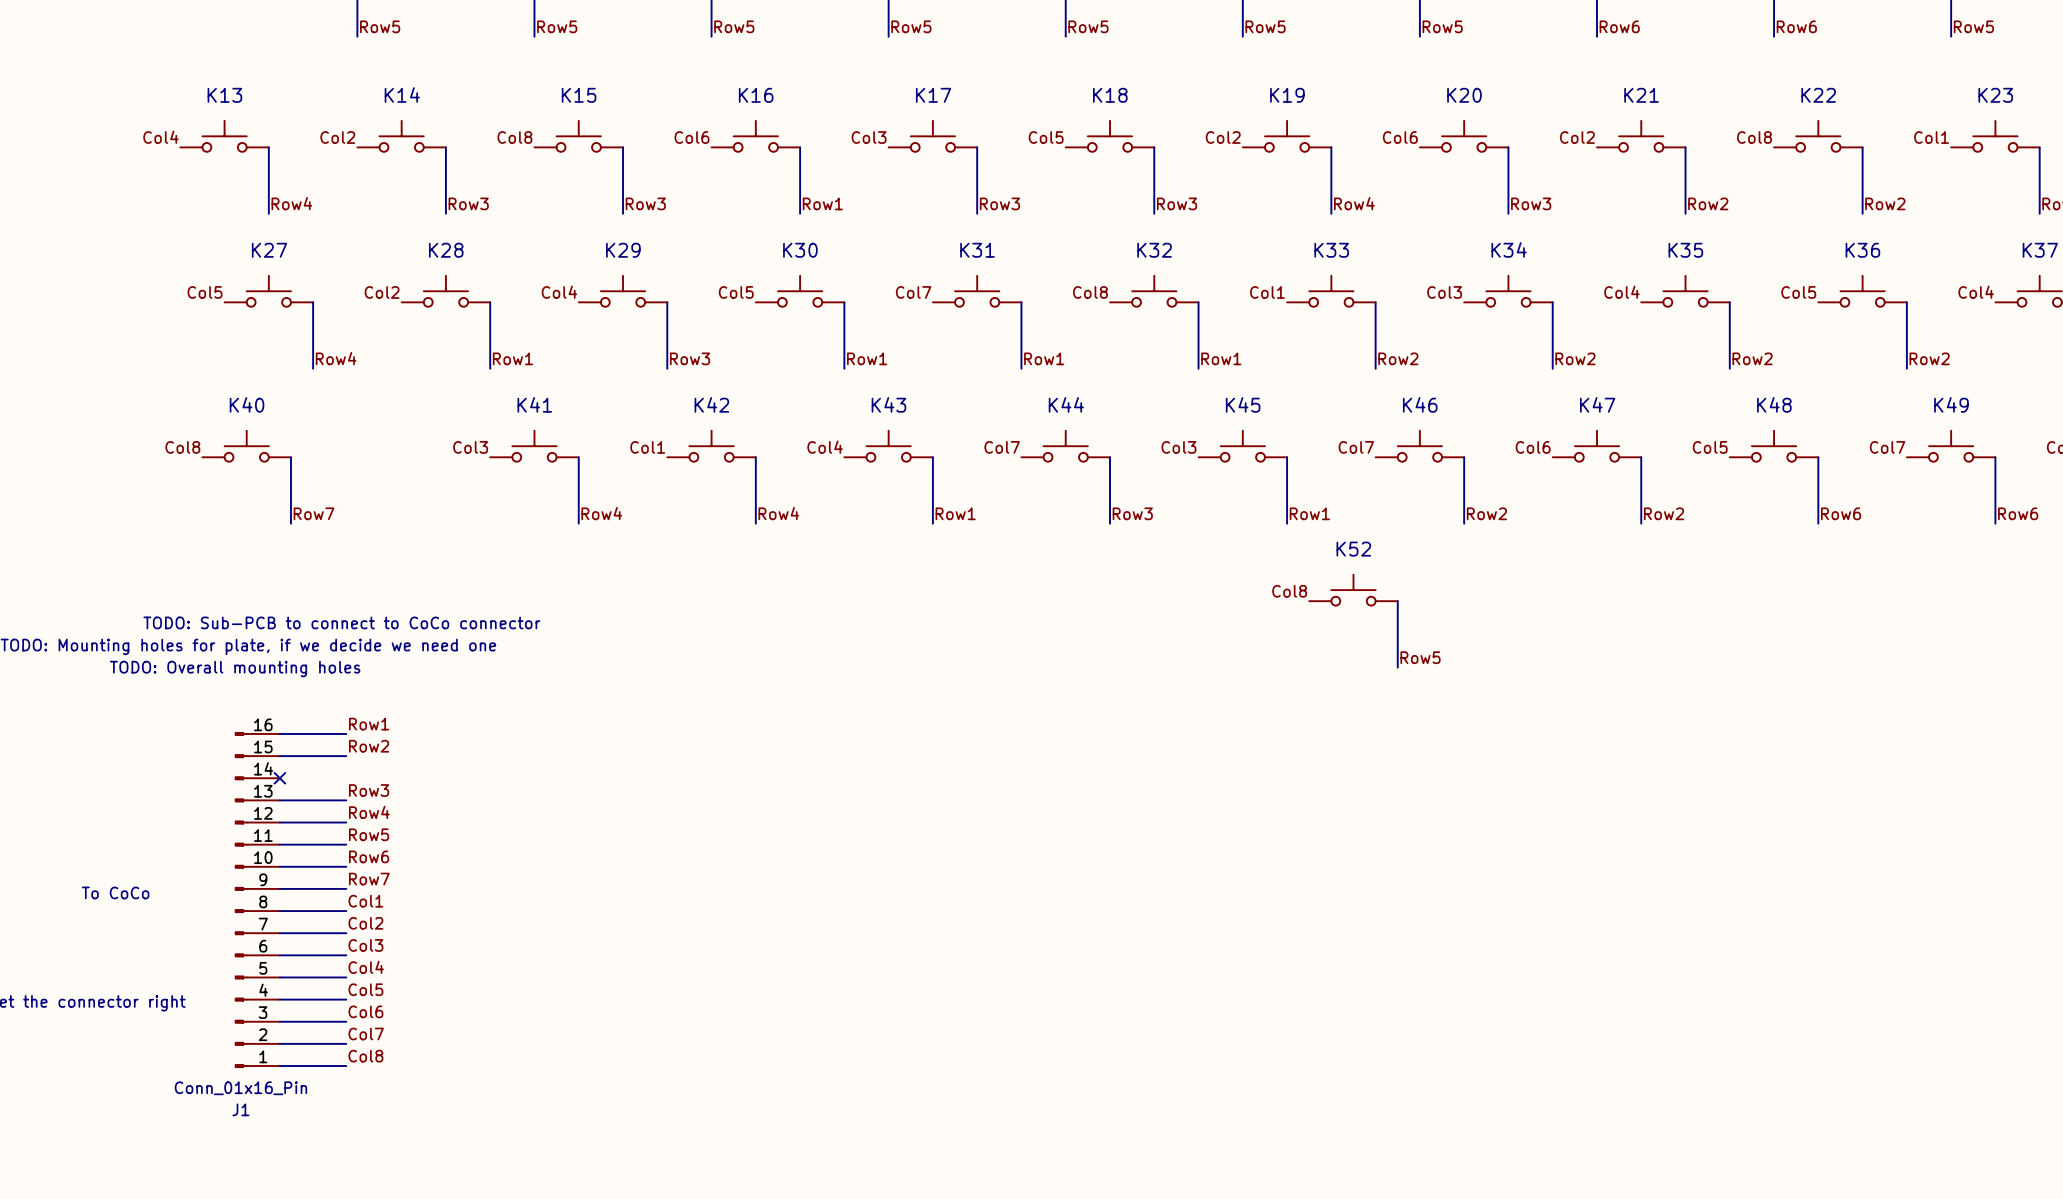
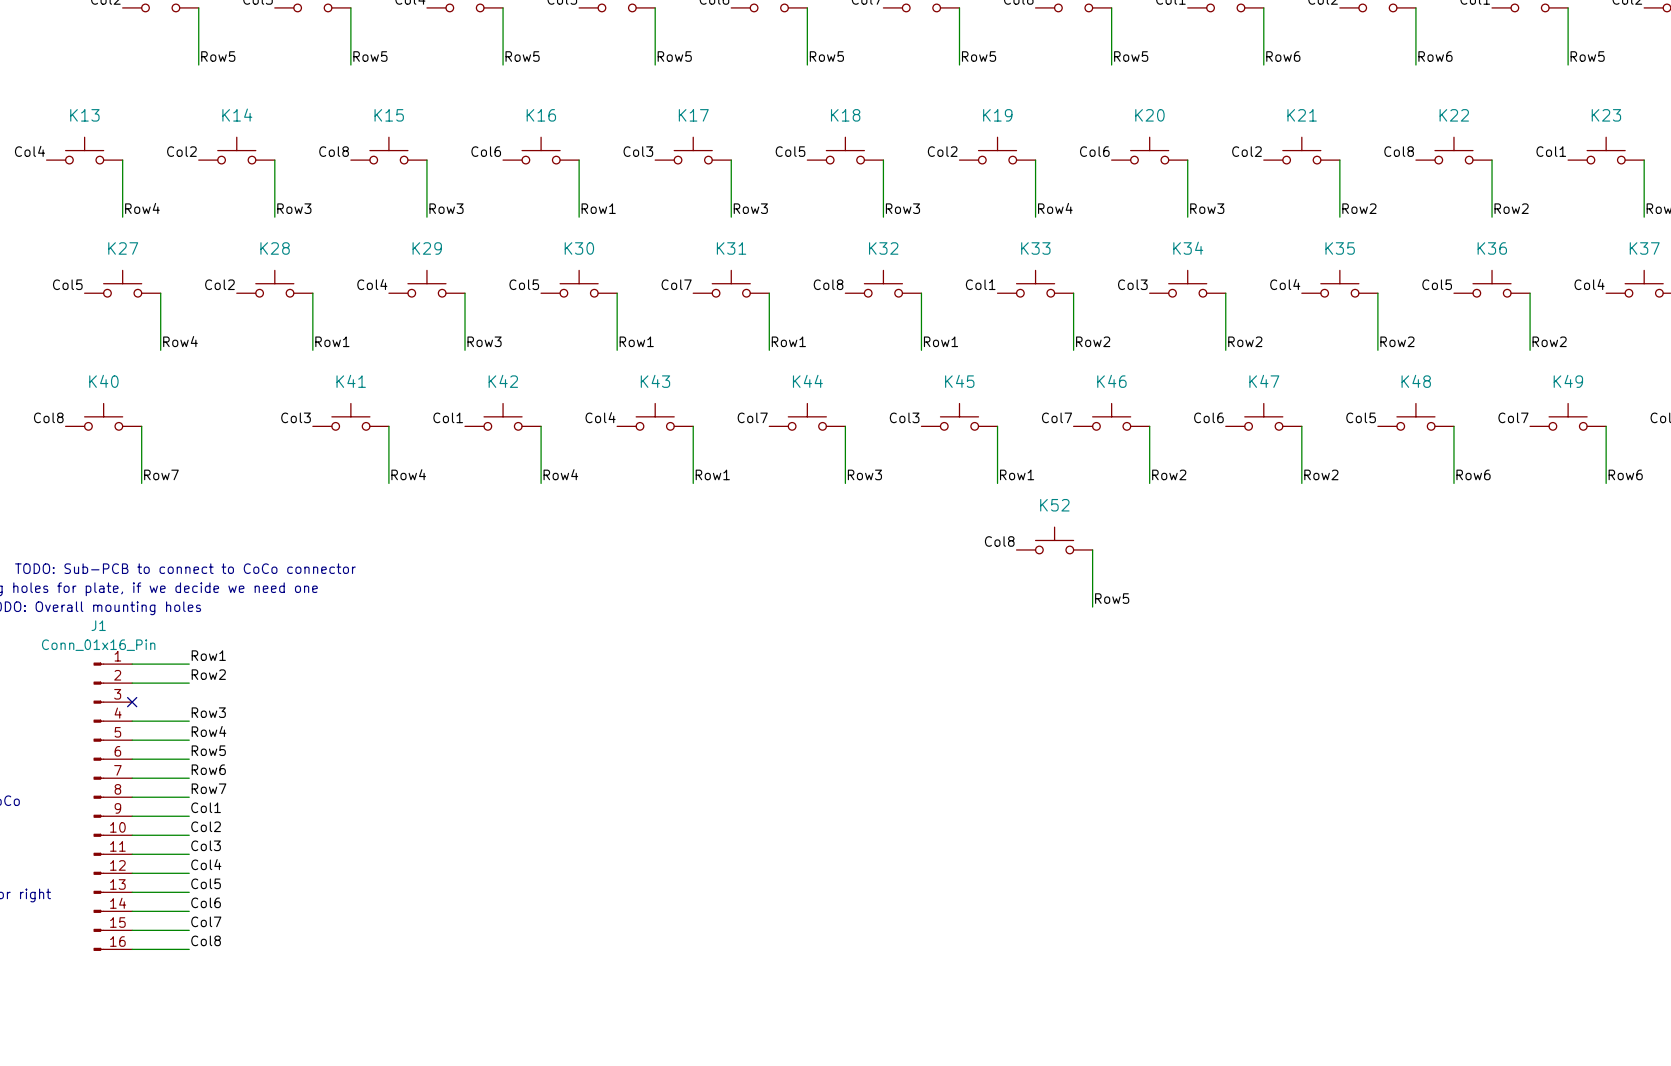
J1 flip: as is (241, 900) -> up-down (98, 806)

